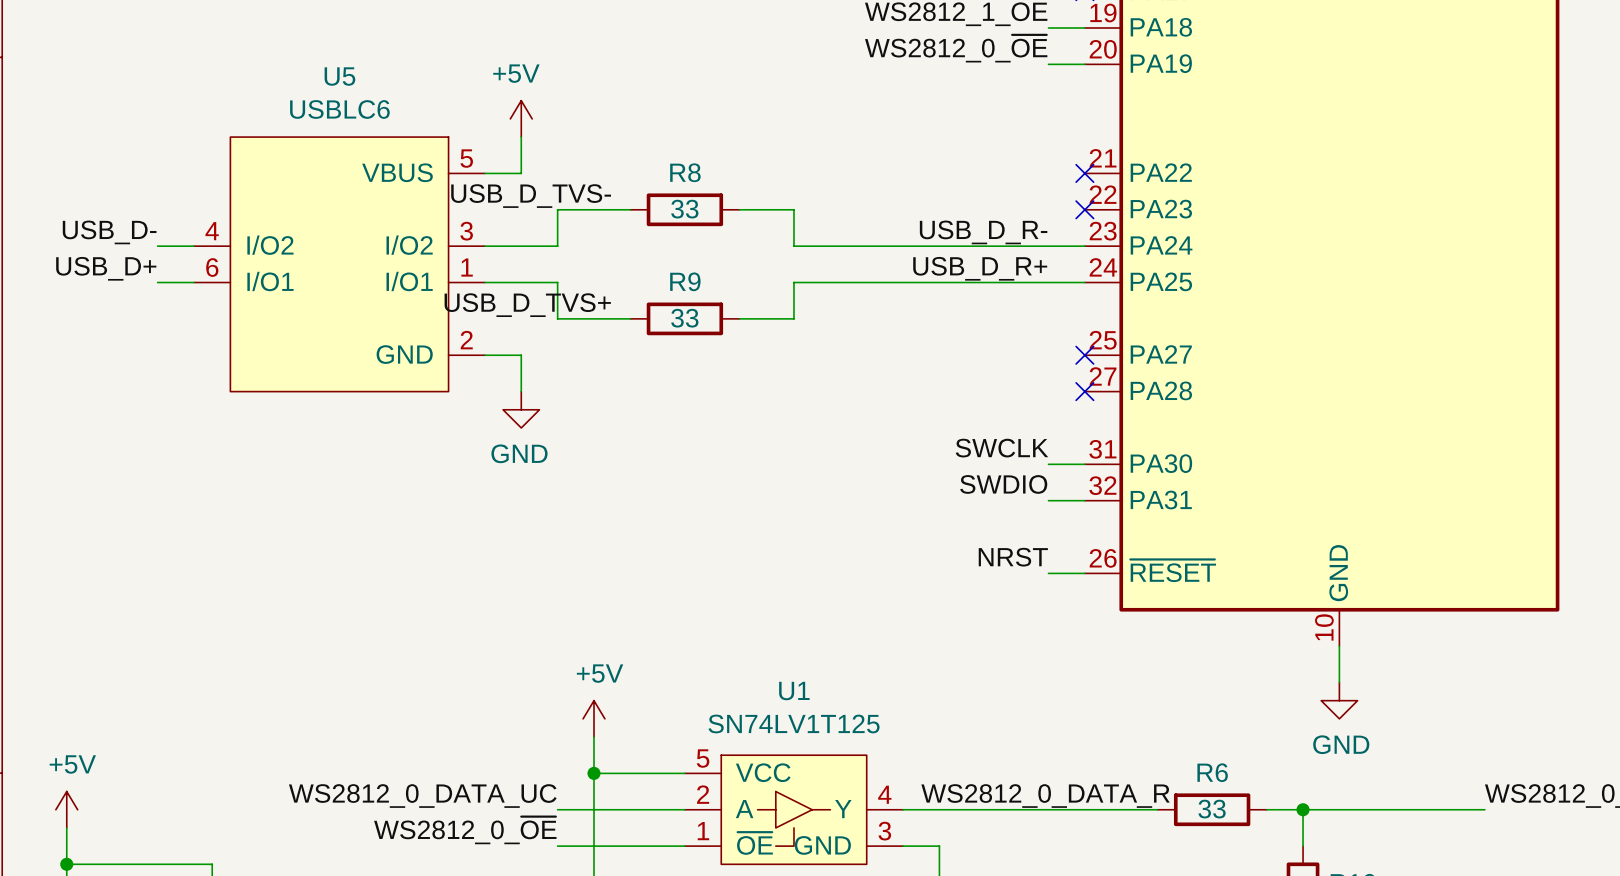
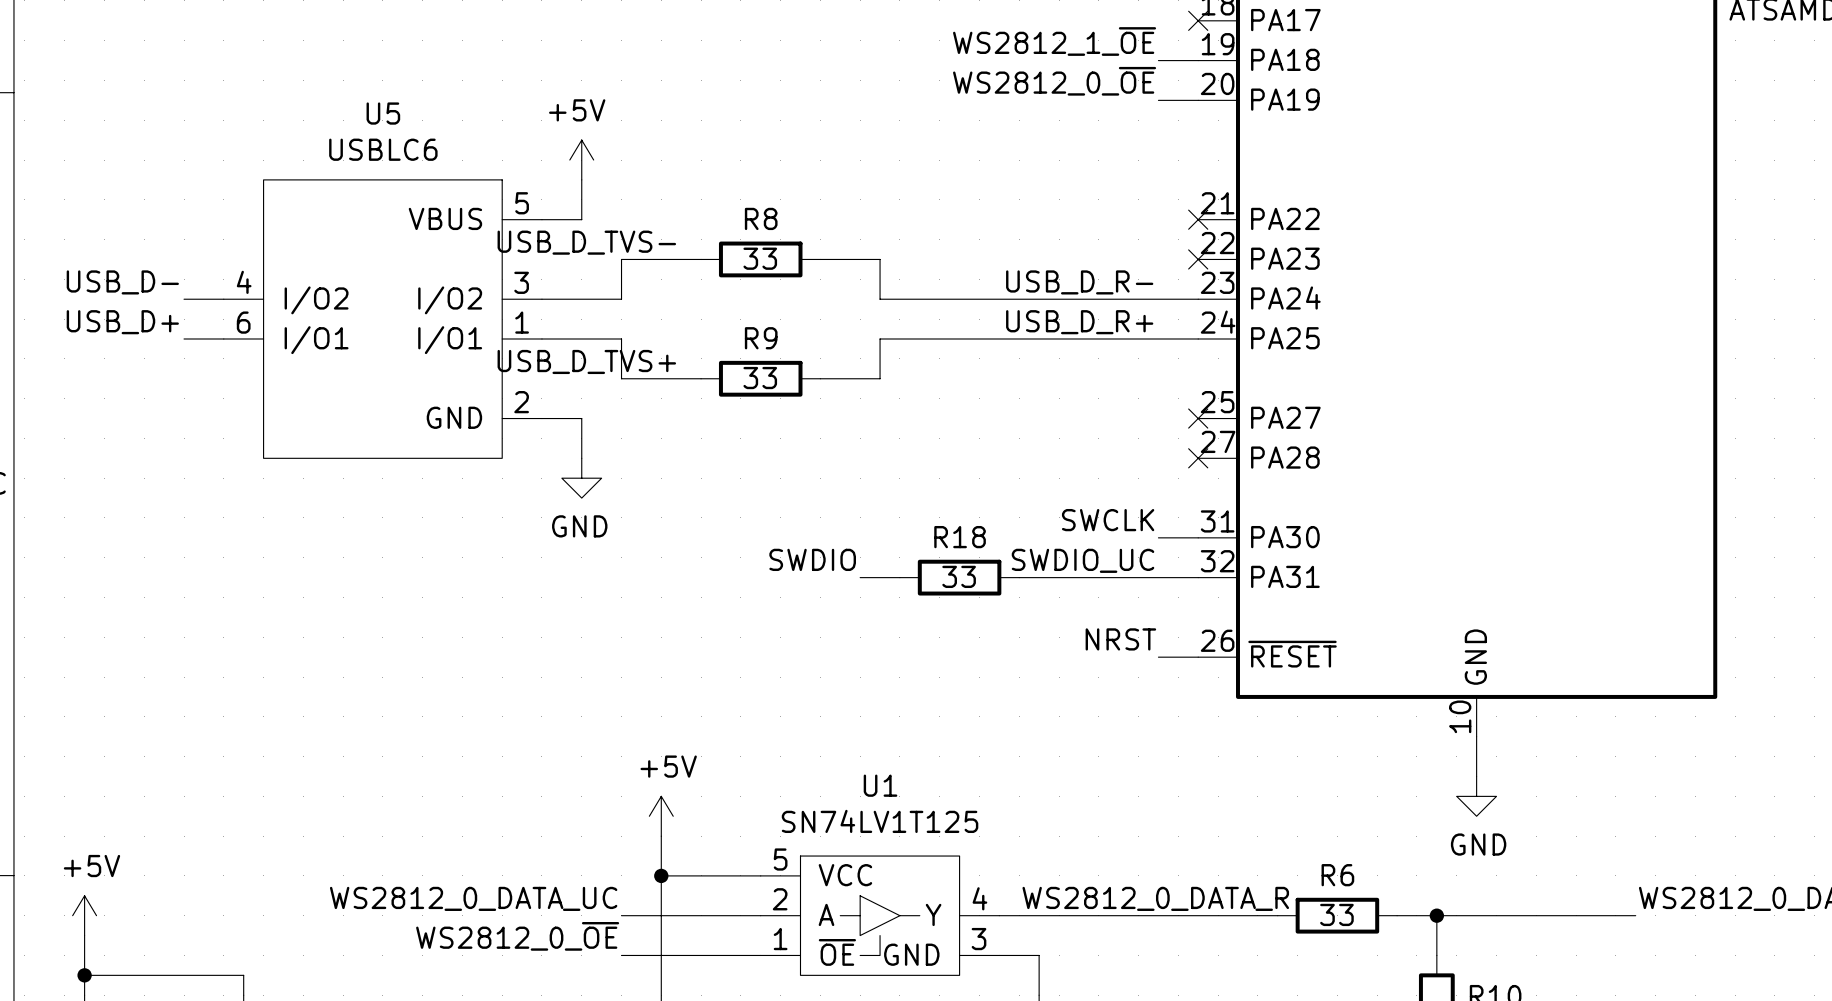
label: none -> SWDIO (812, 559)
label: SWDIO (1003, 484) -> SWDIO_UC (1083, 560)
wire: none -> (860, 577) (899, 577)
R18: none -> 33 (959, 577)
wire: none -> (1019, 577) (1158, 577)

